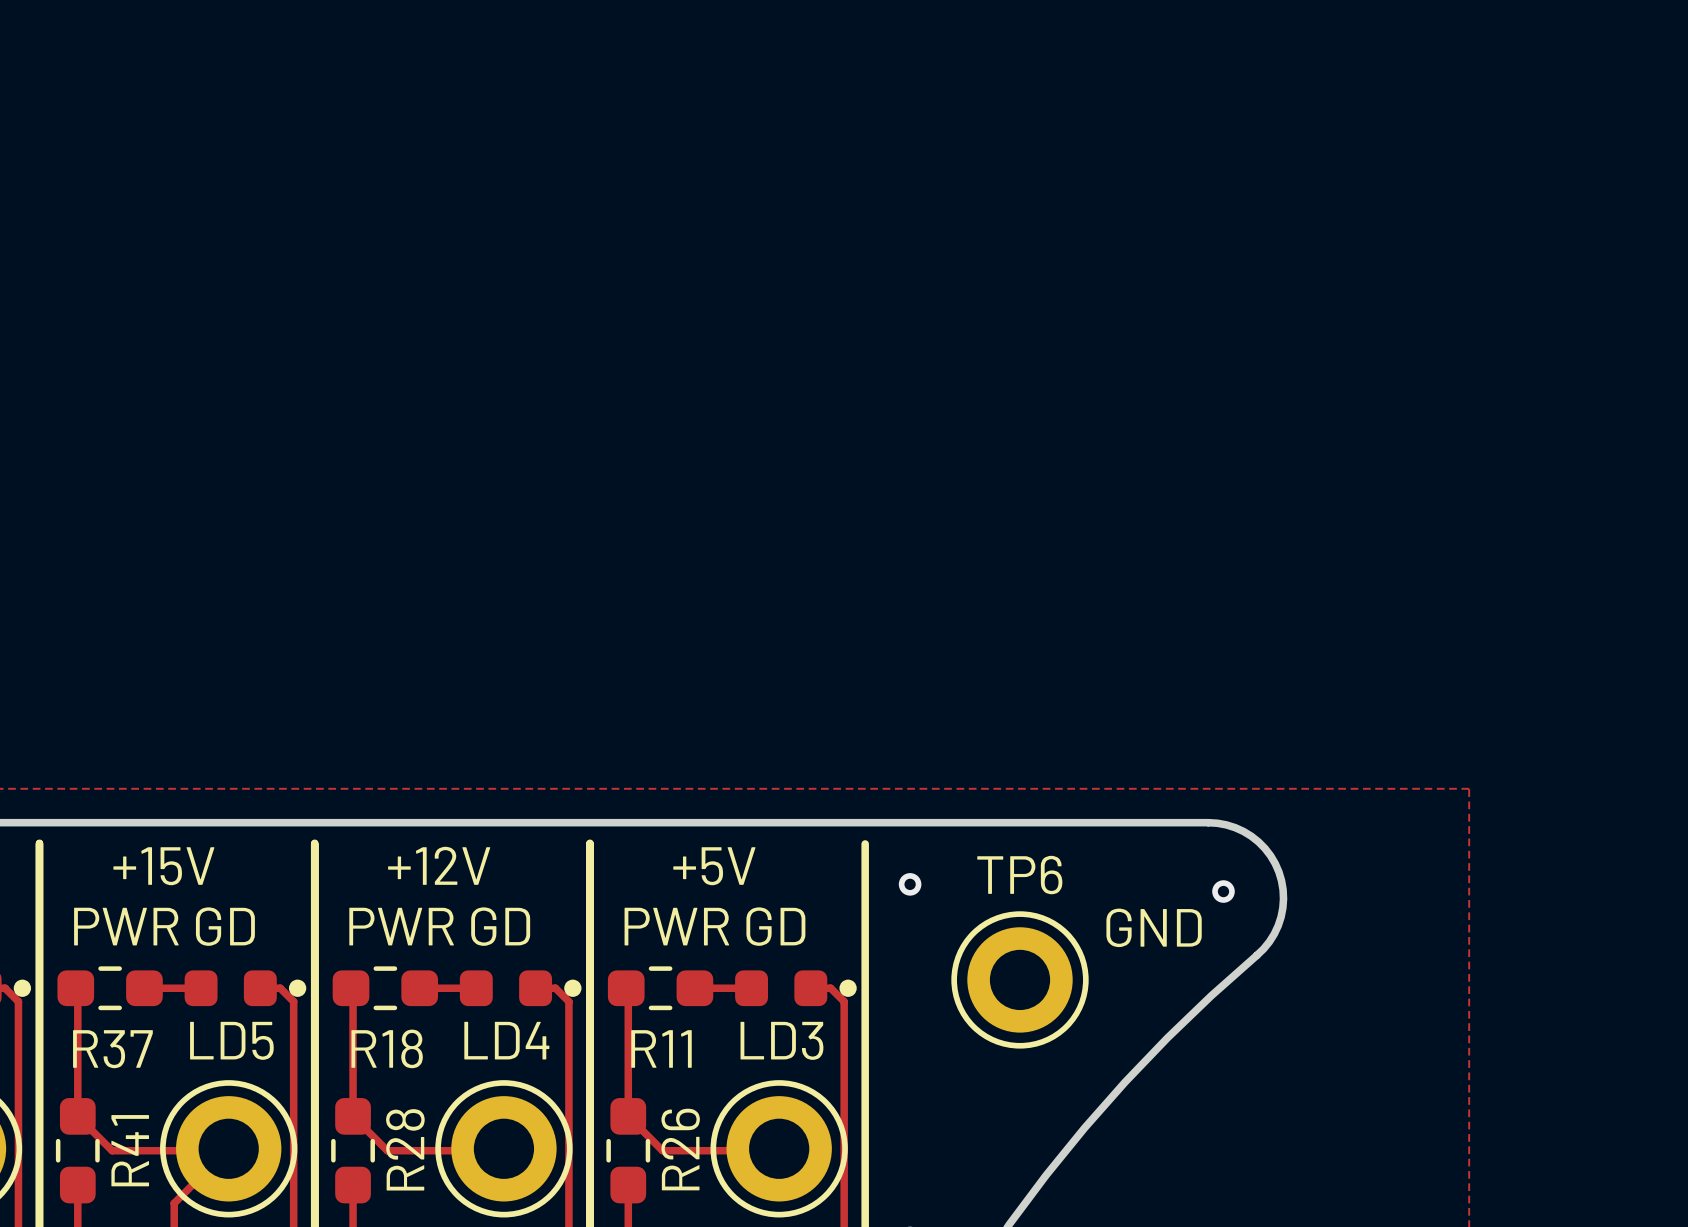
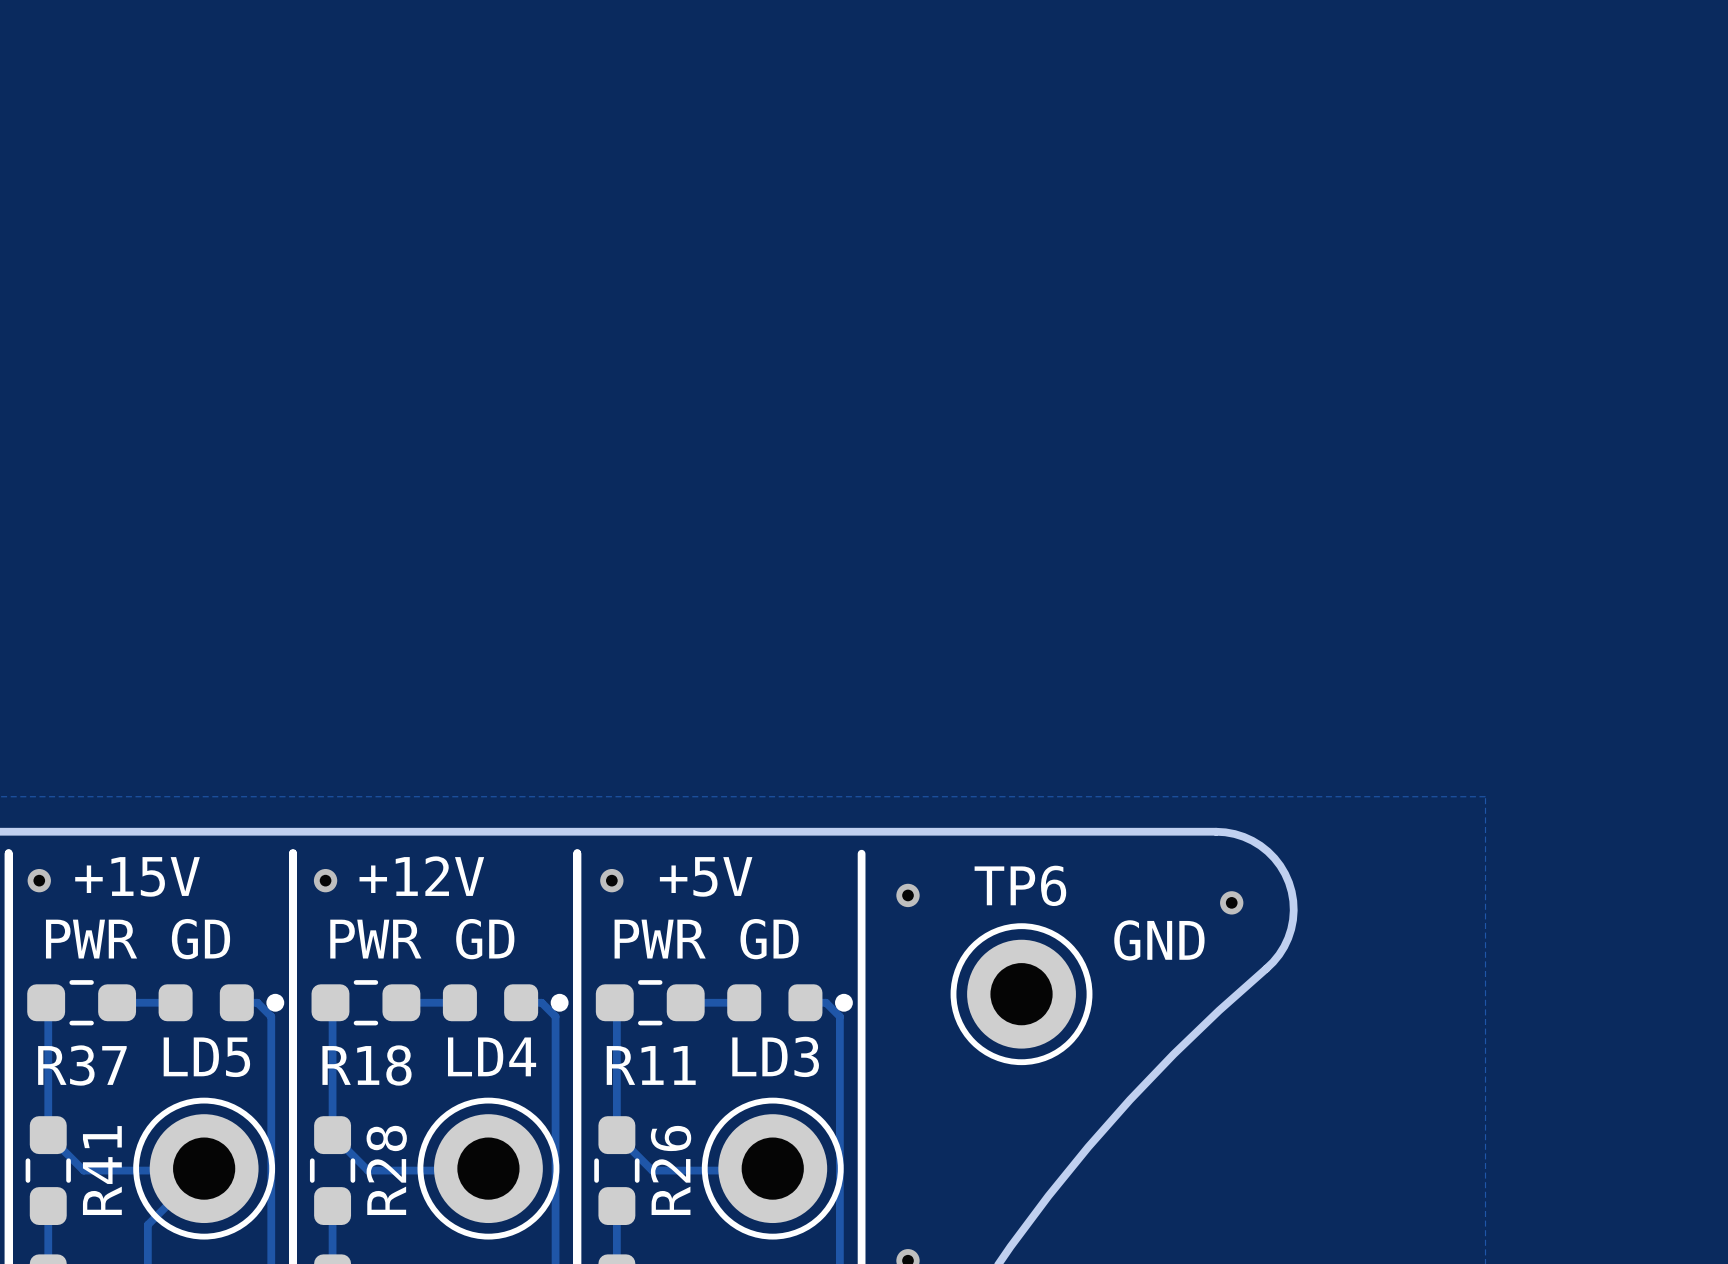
via: none -> (39, 880)
via: none -> (325, 880)
via: none -> (611, 880)

